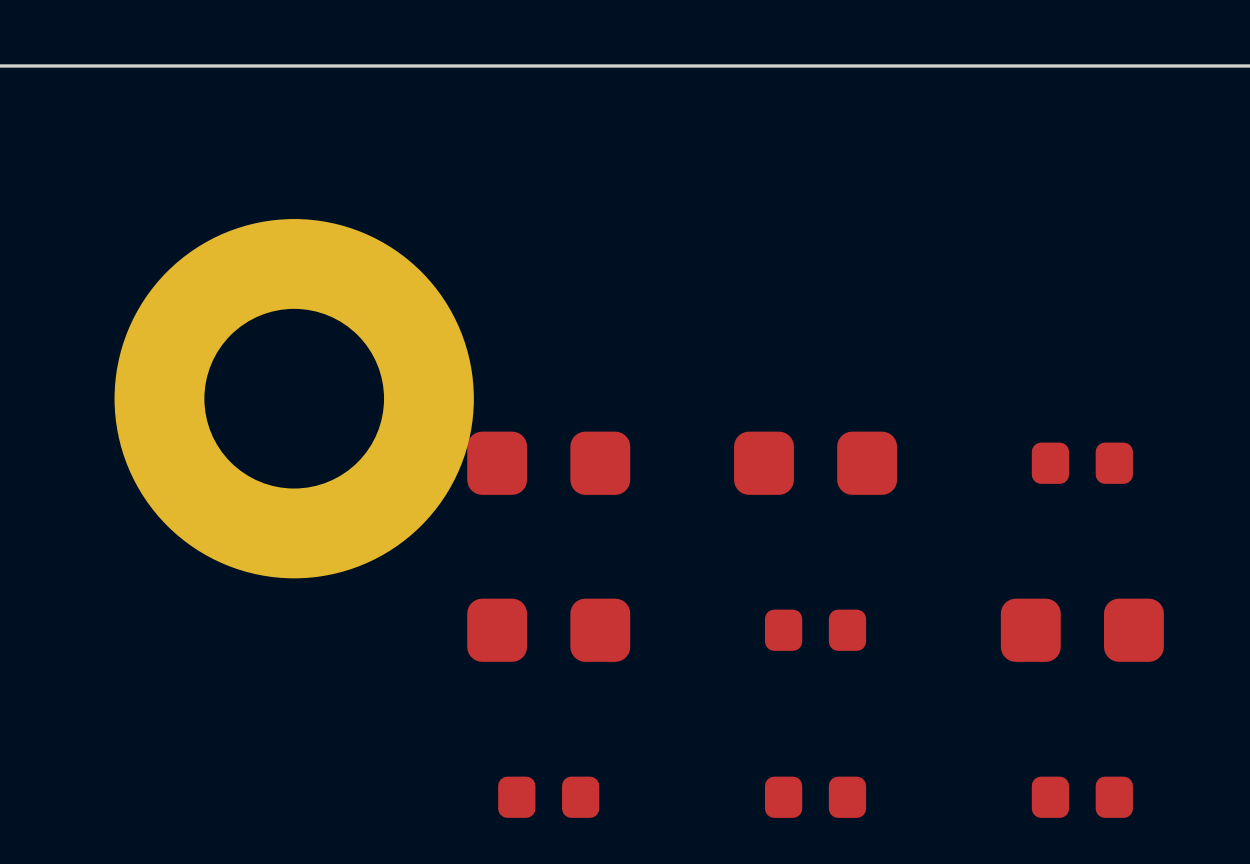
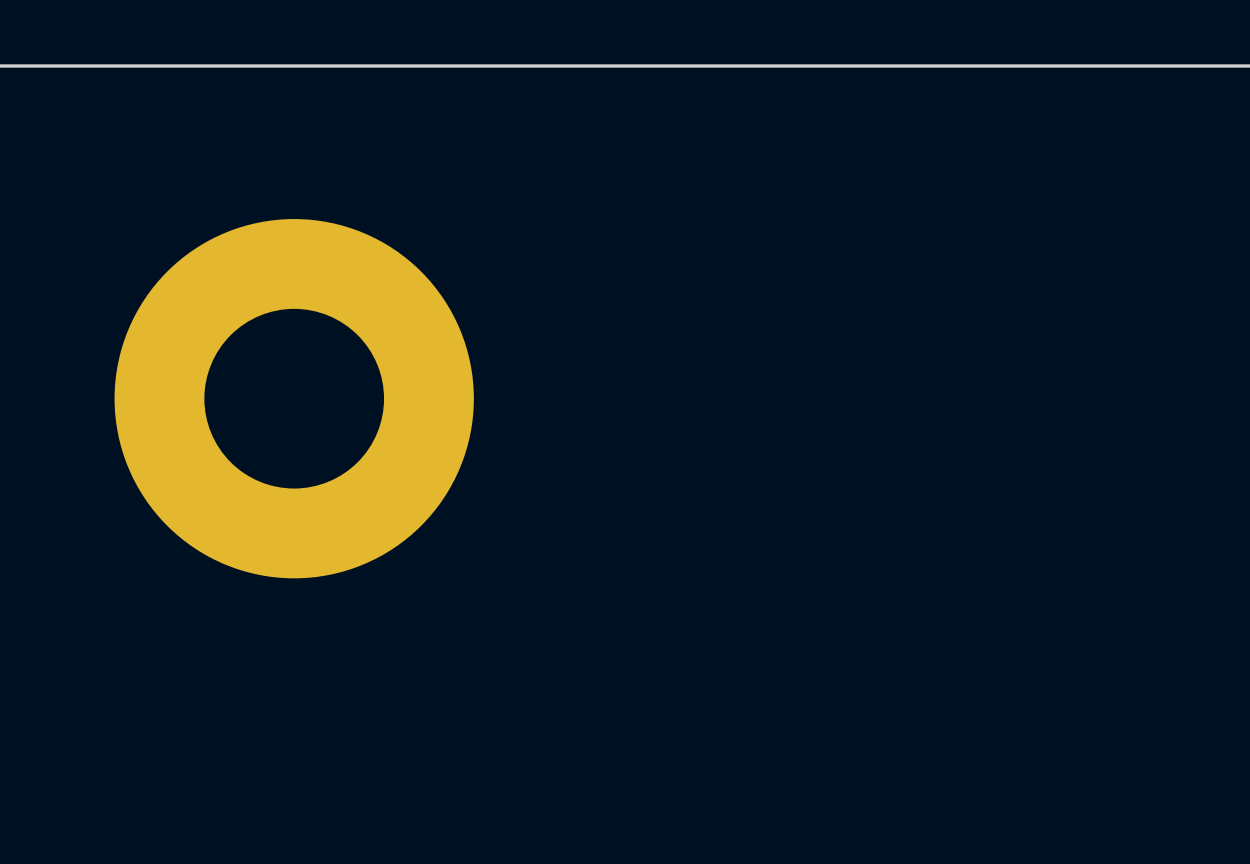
part: (548, 463) -> none
part: (815, 463) -> none
part: (1082, 463) -> none
part: (548, 630) -> none
part: (815, 630) -> none
part: (1082, 630) -> none
part: (548, 797) -> none
part: (815, 797) -> none
part: (1082, 797) -> none

